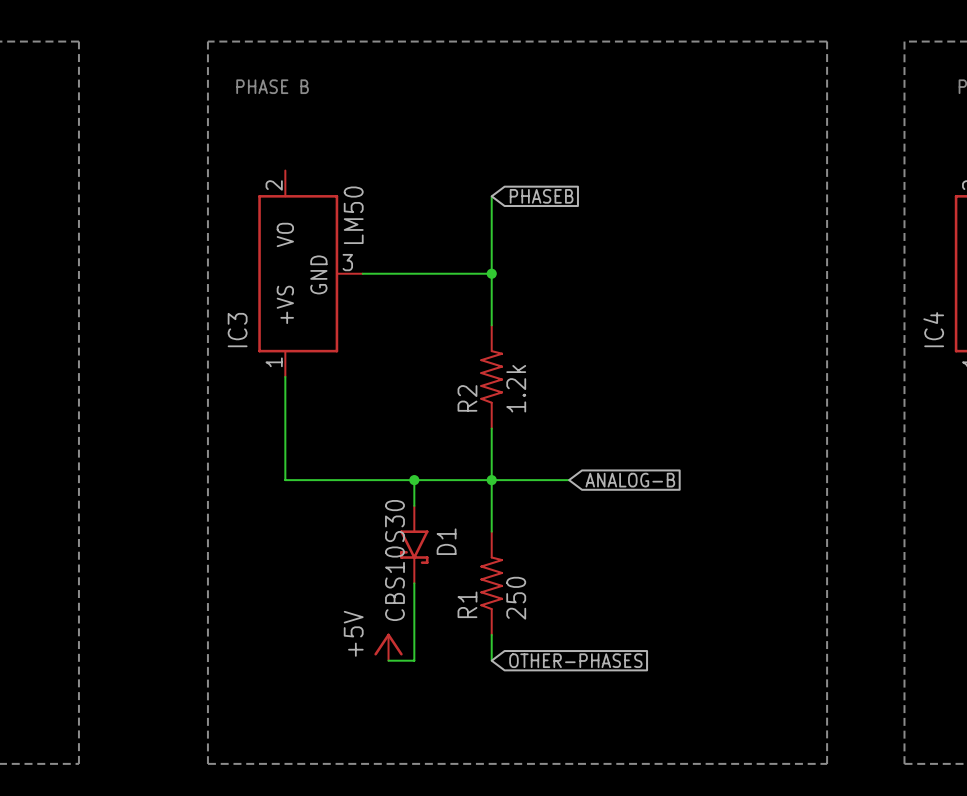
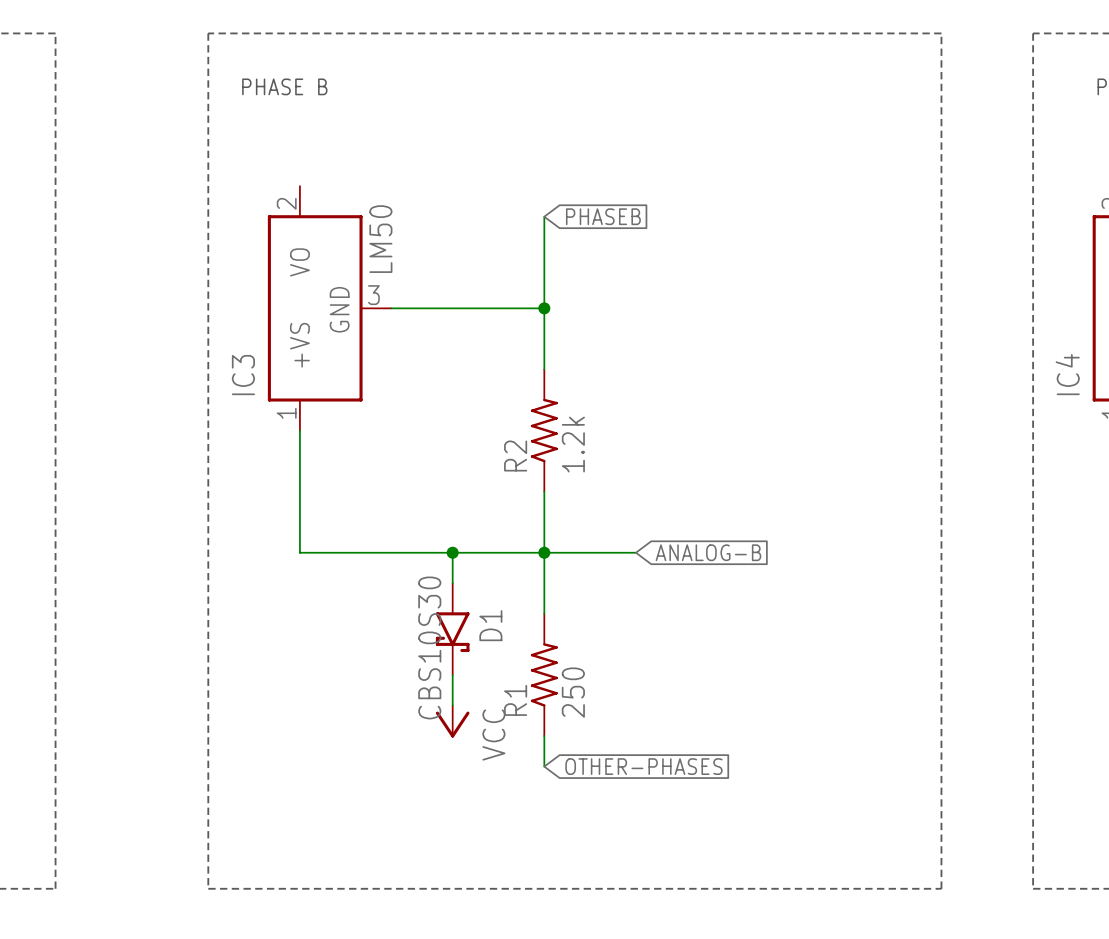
wire: (414, 609) (414, 660) (388, 660) -> none
power symbol: none -> VCC (452, 721)
power symbol: +5V (388, 647) -> none

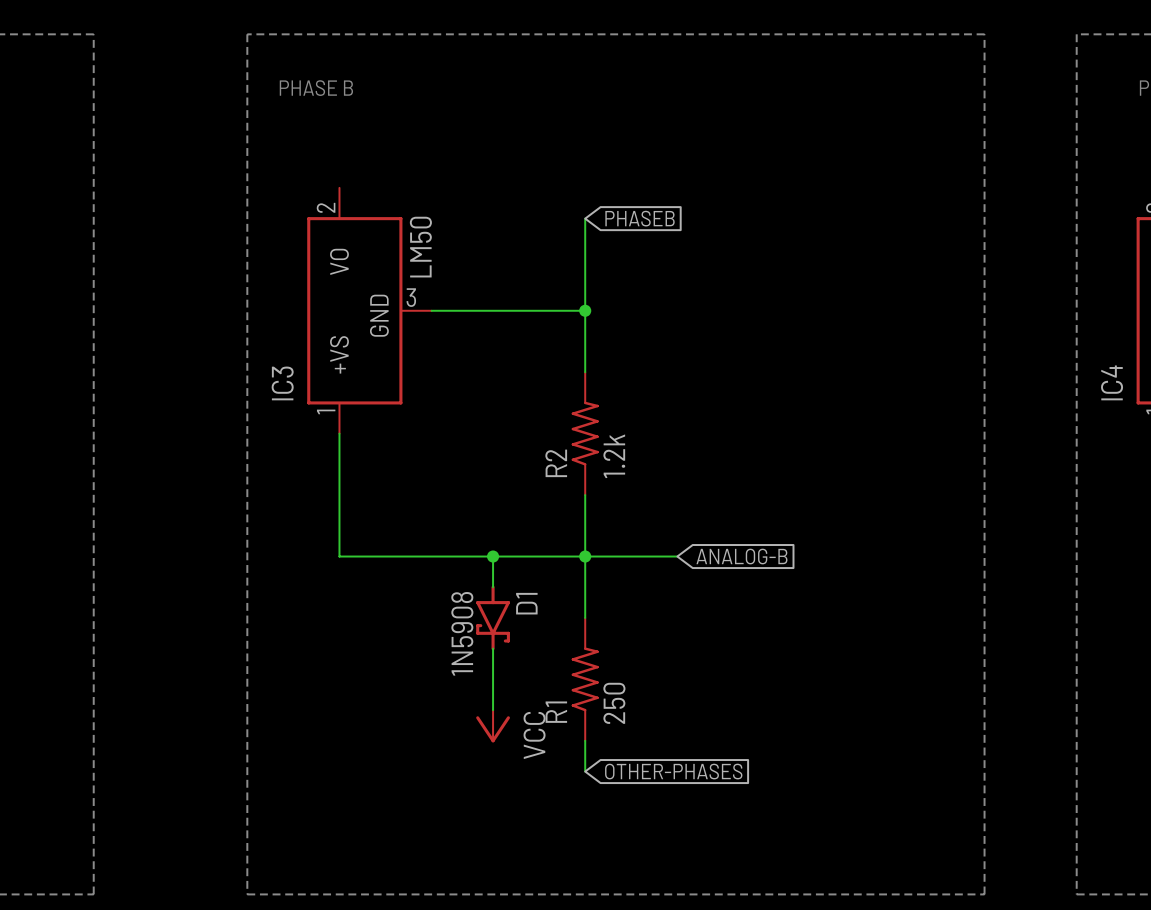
D1 symbol: [435, 583, 470, 675] -> [476, 585, 510, 651]
D1 value: CBS10S30 (429, 647) -> 1N5908 (462, 633)

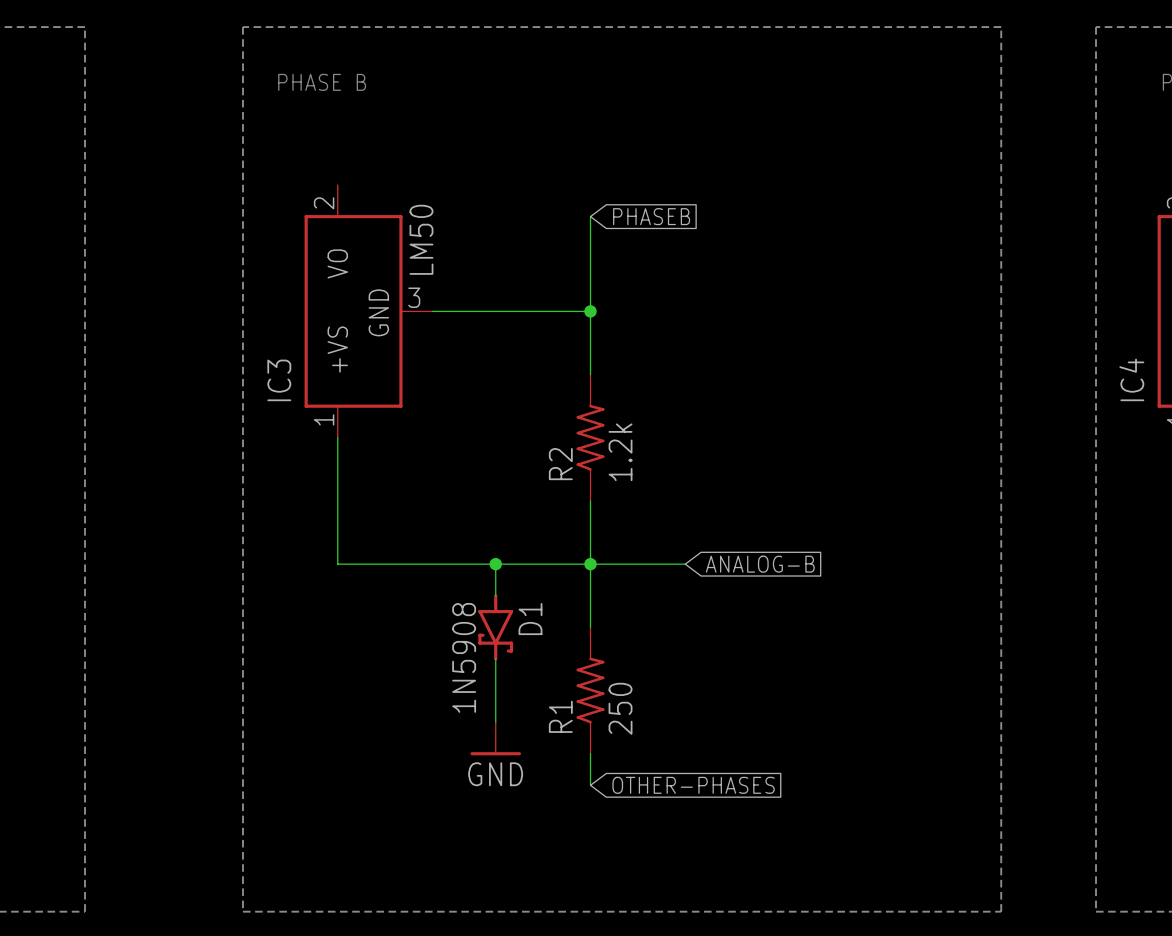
power symbol: VCC (493, 726) -> GND (495, 738)

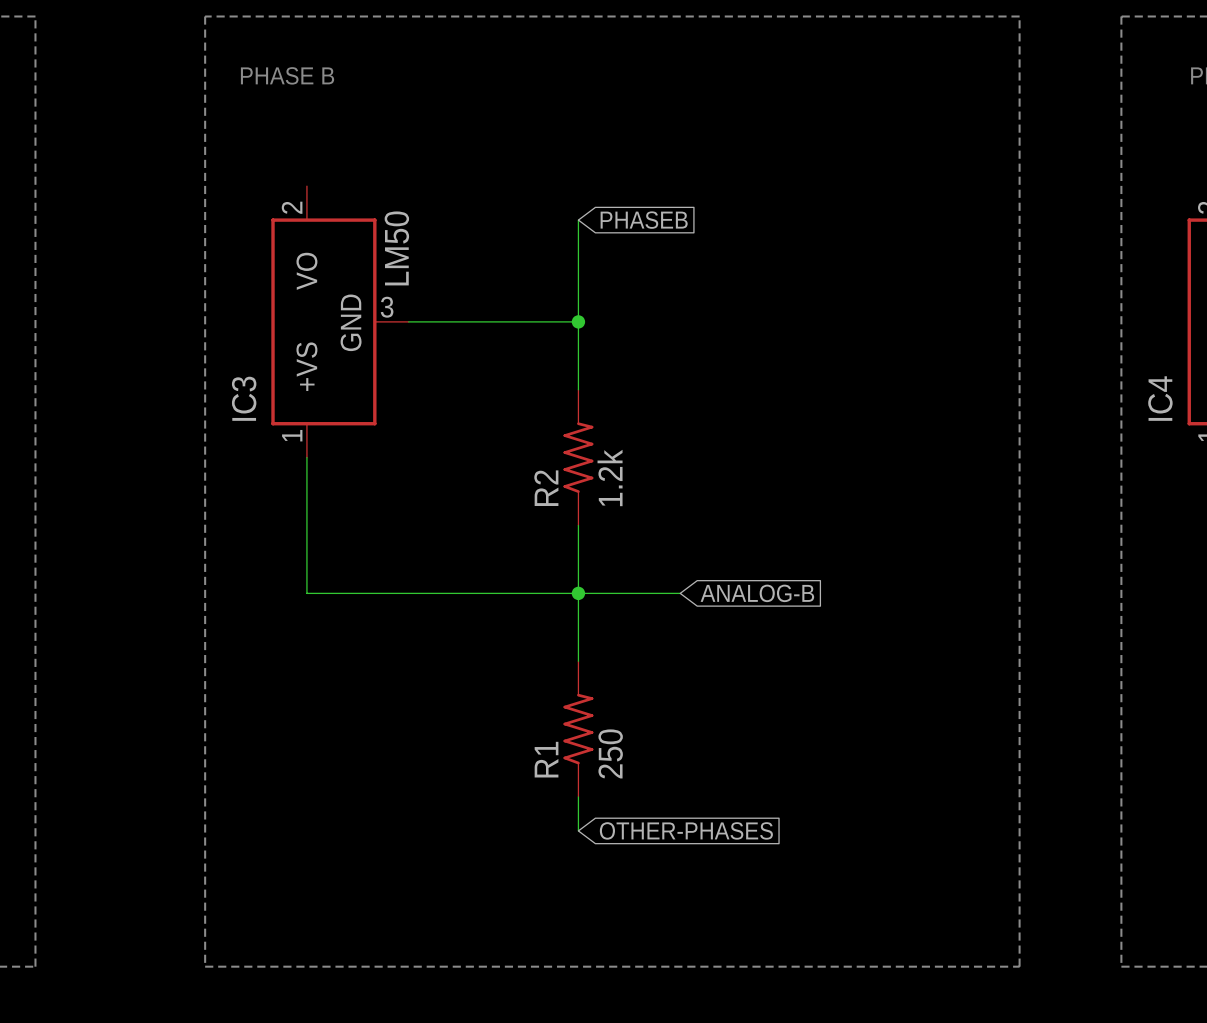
wire: (495, 564) (495, 595) -> none
junction: (495, 564) -> none
D1: 1N5908 (495, 627) -> none
wire: (495, 658) (495, 722) -> none
power symbol: GND (495, 738) -> none

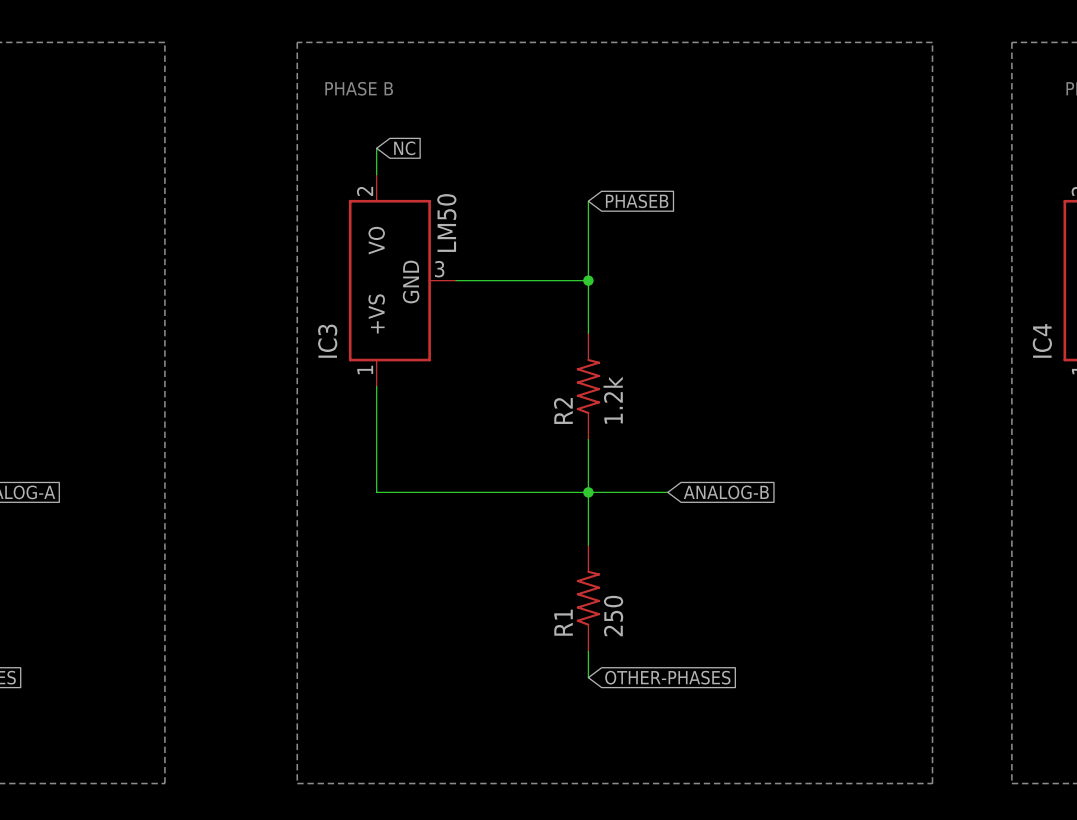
wire: none -> (376, 148) (376, 174)
global label: none -> NC (404, 148)

